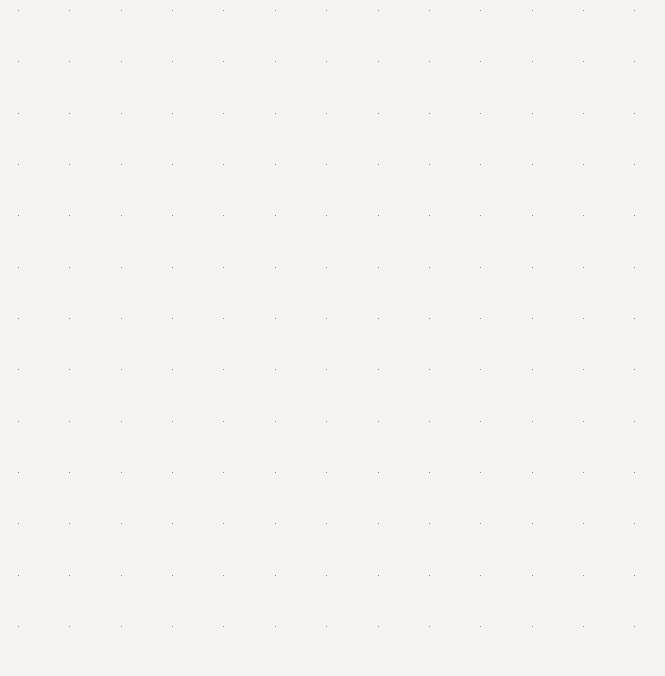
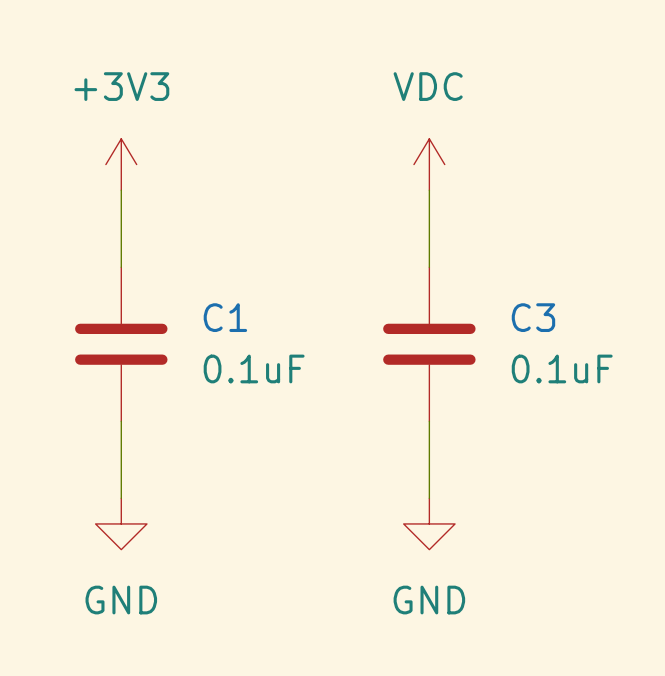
power symbol: none -> +3V3 (121, 164)
power symbol: none -> VDC (429, 164)
wire: none -> (121, 190) (121, 267)
wire: none -> (429, 190) (429, 267)
C1: none -> 0.1uF (121, 344)
C3: none -> 0.1uF (429, 344)
wire: none -> (121, 421) (121, 498)
wire: none -> (429, 421) (429, 498)
power symbol: none -> GND (121, 523)
power symbol: none -> GND (429, 523)

